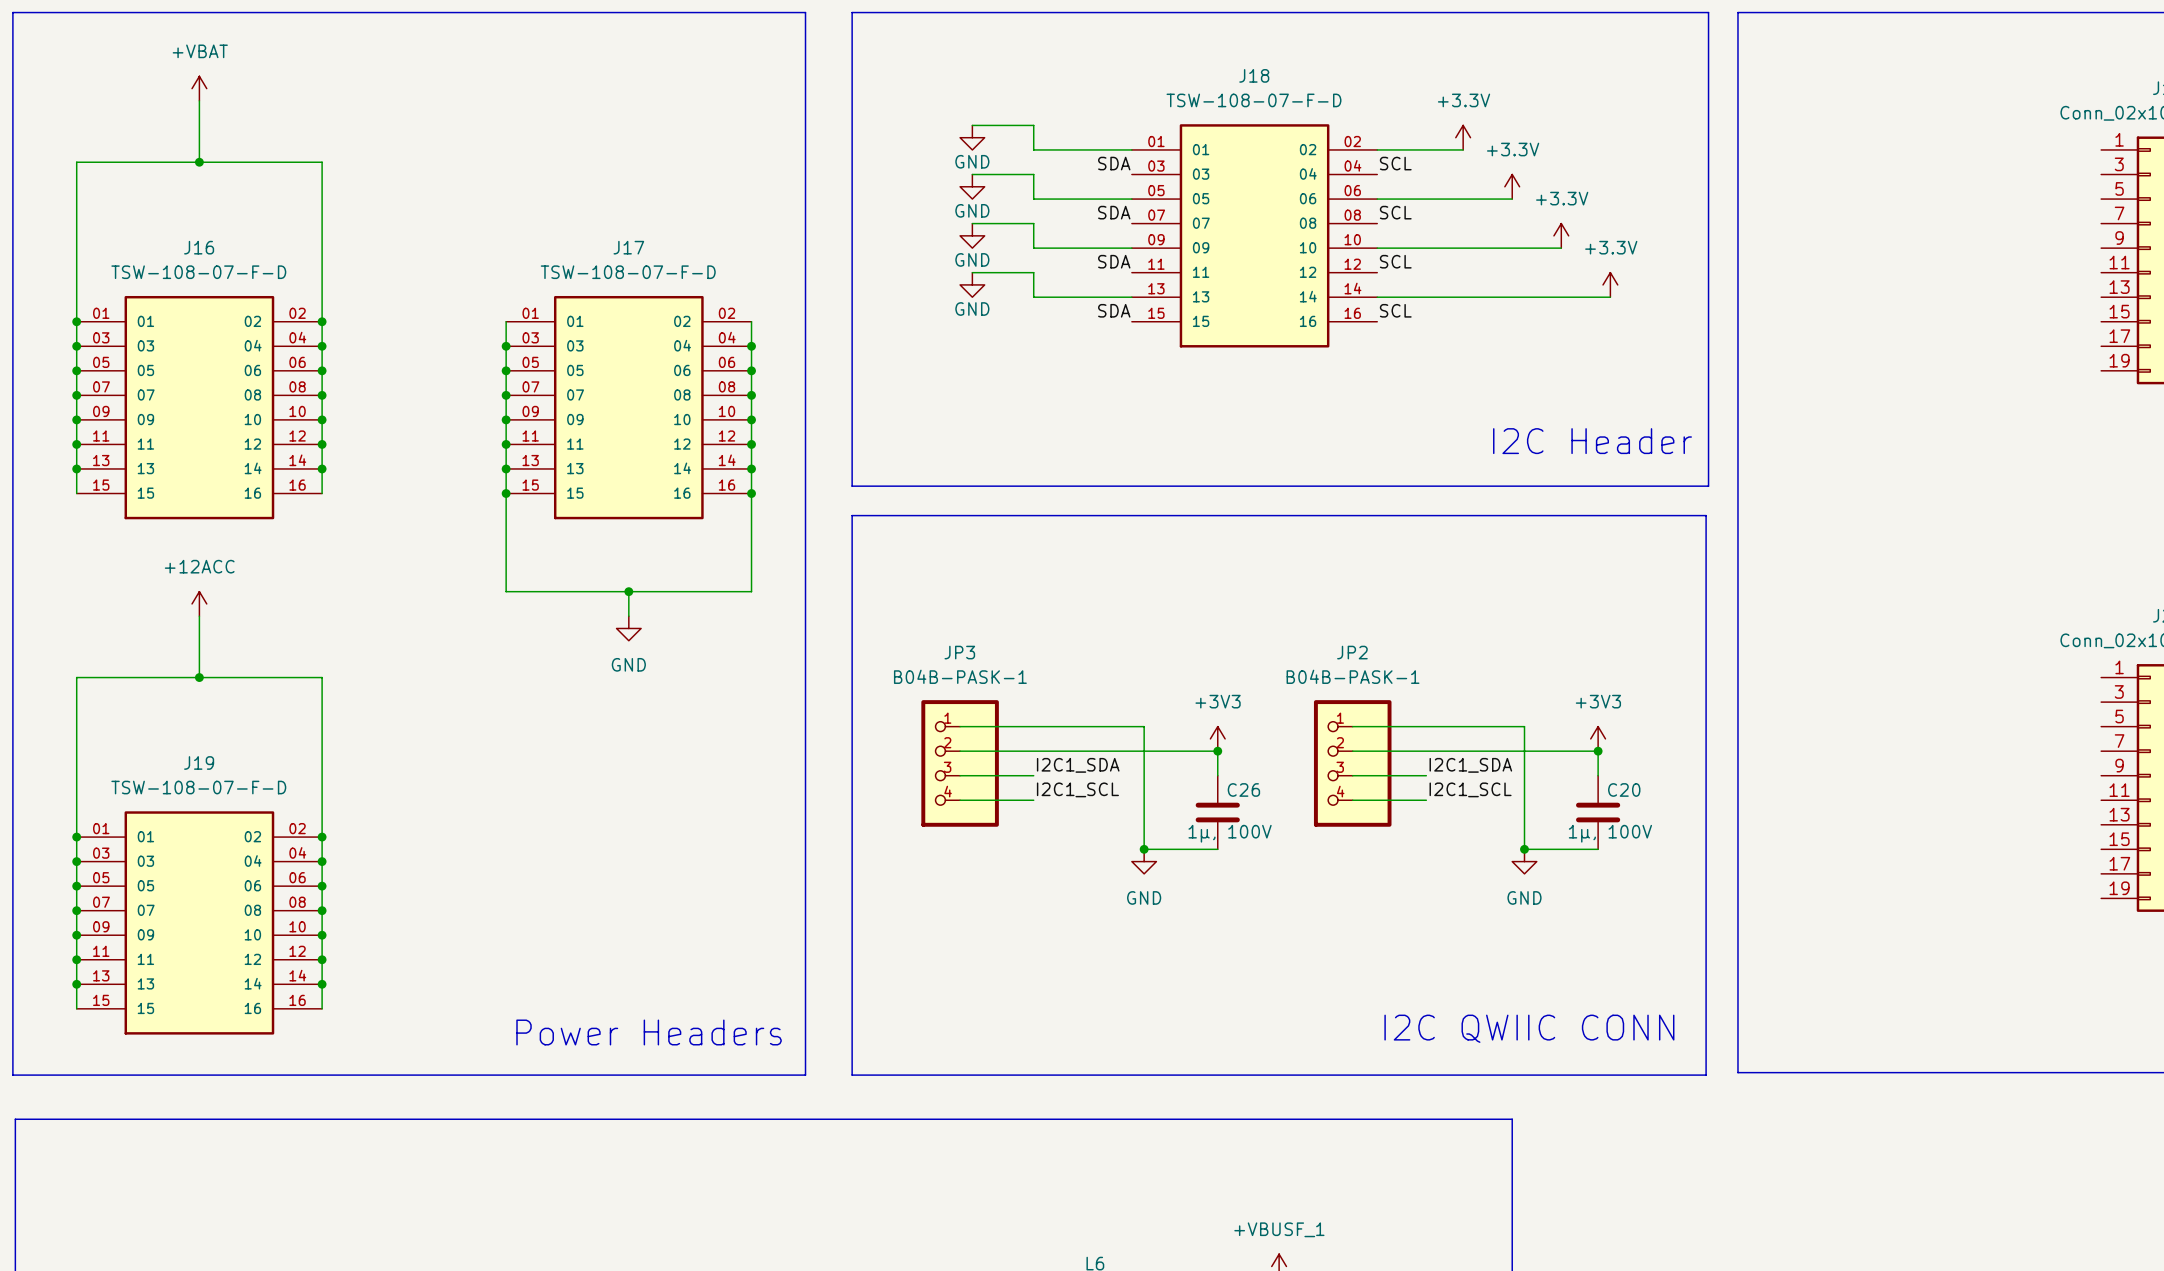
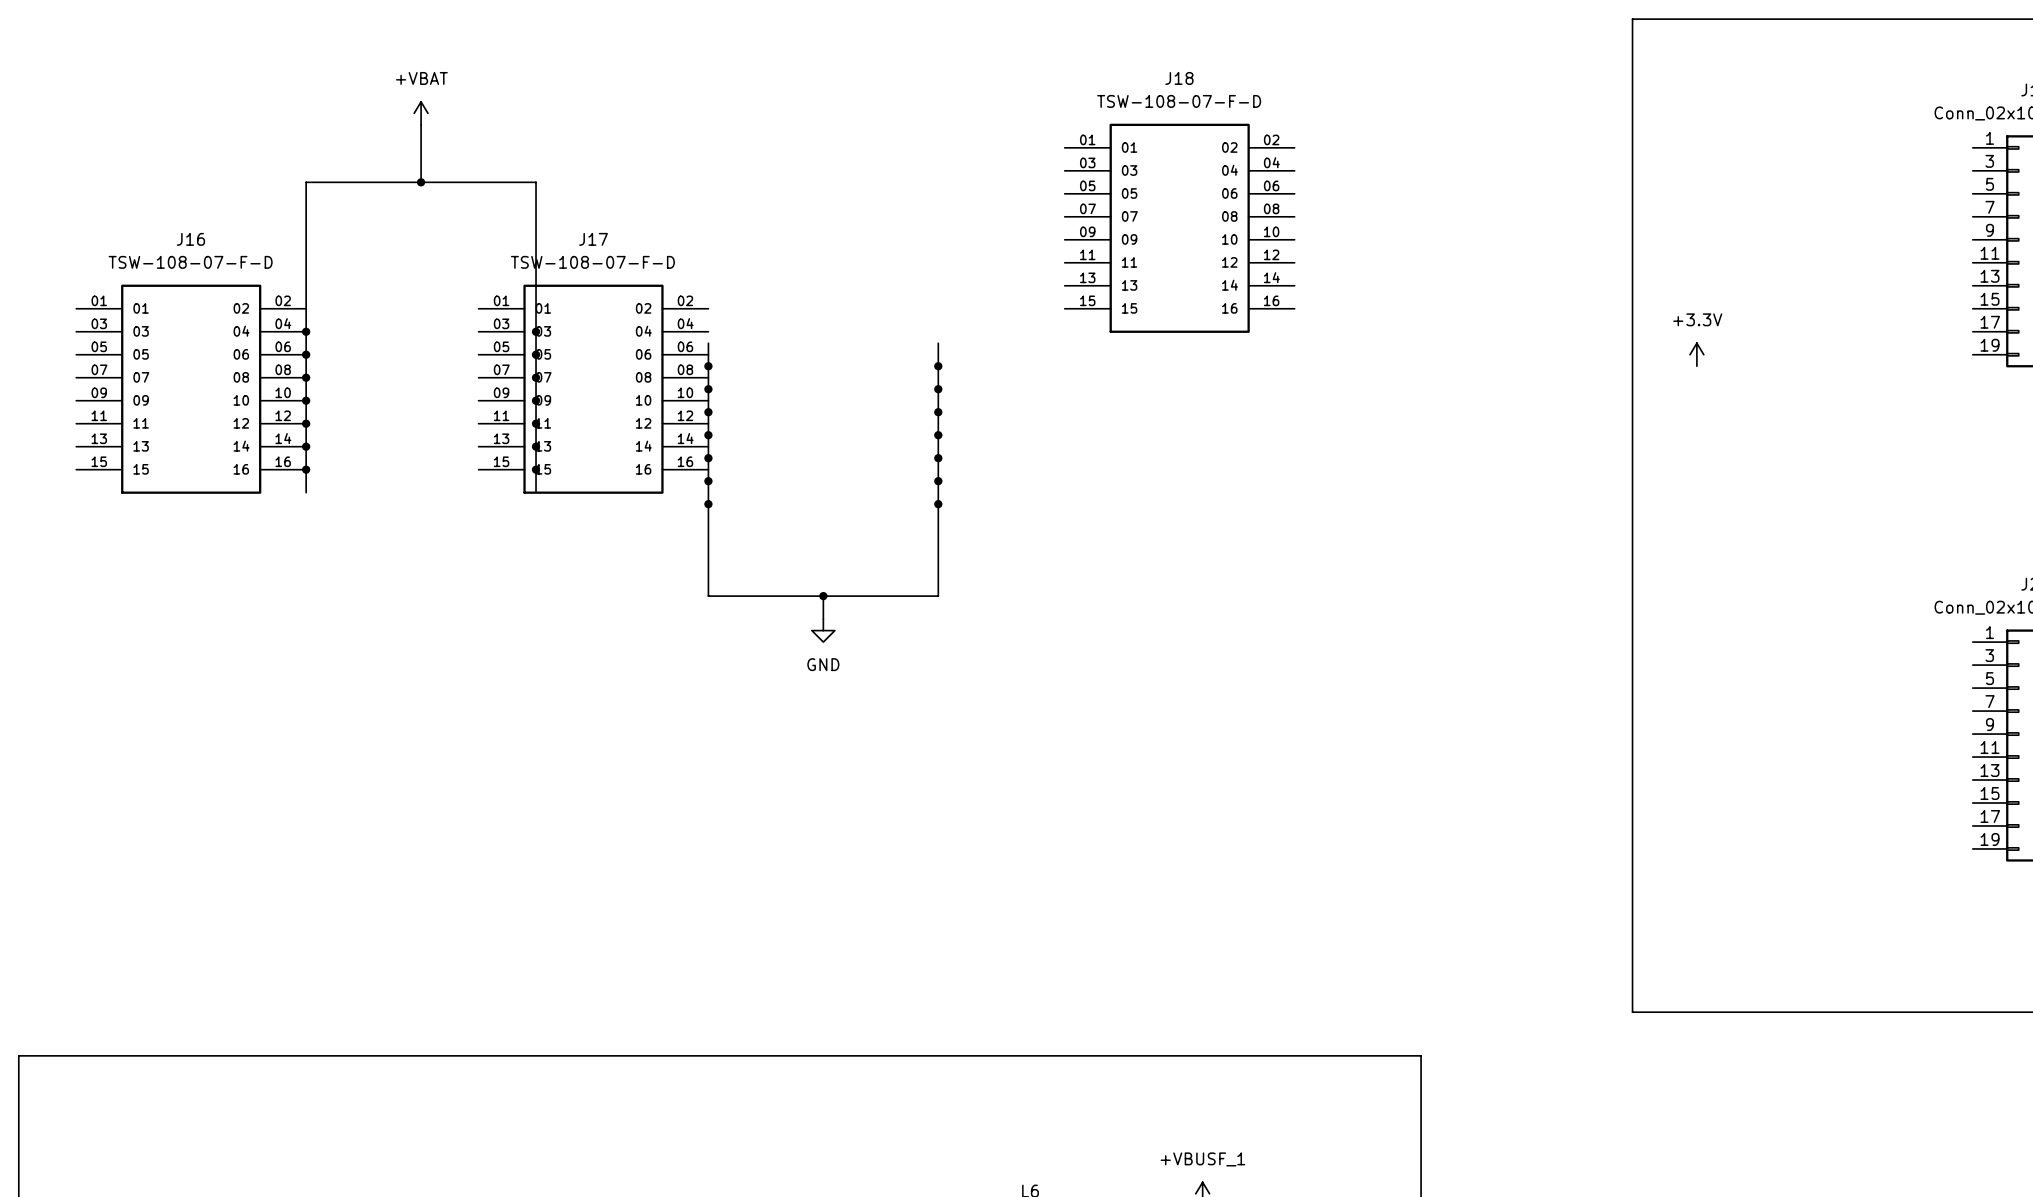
line: (12, 12) (805, 12) (805, 1075) (12, 1075) (12, 12) -> none
line: (852, 12) (1708, 12) (1708, 486) (852, 486) (852, 12) -> none
power symbol: +VBAT (199, 88) -> none
wire: (199, 100) (199, 162) -> none
power symbol: none -> +VBAT (421, 113)
wire: none -> (421, 124) (421, 182)
wire: (972, 125) (1033, 125) (1033, 149) (1131, 149) -> none
power symbol: GND (972, 137) -> none
power symbol: +3.3V (1463, 137) -> none
wire: (1377, 149) (1463, 149) -> none
junction: (199, 162) -> none
label: SDA (1114, 163) -> none
label: SCL (1395, 163) -> none
wire: (972, 174) (1033, 174) (1033, 199) (1131, 199) -> none
wire: (322, 186) (322, 162) (76, 162) (76, 493) -> (306, 182) (536, 182) (536, 492)
junction: none -> (421, 182)
power symbol: GND (972, 186) -> none
power symbol: +3.3V (1512, 186) -> none
wire: (1377, 199) (1512, 199) -> none
label: SDA (1114, 212) -> none
label: SCL (1395, 212) -> none
wire: (972, 223) (1033, 223) (1033, 248) (1131, 248) -> none
power symbol: GND (972, 235) -> none
power symbol: +3.3V (1561, 235) -> none
wire: (1377, 248) (1561, 248) -> none
label: SDA (1114, 261) -> none
label: SCL (1395, 261) -> none
wire: (972, 272) (1033, 272) (1033, 297) (1131, 297) -> none
power symbol: GND (972, 284) -> none
power symbol: +3.3V (1610, 284) -> none
wire: (1377, 297) (1610, 297) -> none
label: SDA (1114, 310) -> none
label: SCL (1395, 310) -> none
junction: (76, 321) -> none
junction: (322, 321) -> none
wire: (506, 321) (506, 591) (751, 591) -> (938, 343) (938, 596) (708, 596) (708, 561)
wire: (751, 321) (751, 358) -> none
junction: (76, 346) -> none
junction: (506, 346) -> none
junction: none -> (536, 331)
junction: (751, 346) -> none
junction: (76, 370) -> none
junction: (506, 370) -> none
junction: none -> (536, 354)
junction: (751, 370) -> none
power symbol: none -> +3.3V (1696, 354)
junction: none -> (708, 366)
junction: none -> (938, 366)
junction: (76, 395) -> none
junction: (506, 395) -> none
junction: none -> (536, 377)
junction: (751, 395) -> none
junction: none -> (708, 389)
junction: none -> (938, 389)
junction: (76, 419) -> none
junction: (506, 419) -> none
junction: none -> (536, 400)
junction: (751, 419) -> none
junction: none -> (708, 412)
junction: none -> (938, 412)
text: I2C Header (1592, 441) -> none
junction: (76, 444) -> none
junction: (506, 444) -> none
junction: none -> (536, 423)
junction: (751, 444) -> none
junction: none -> (708, 435)
junction: none -> (938, 435)
junction: (76, 468) -> none
junction: (506, 468) -> none
junction: none -> (536, 446)
junction: (751, 468) -> none
junction: none -> (708, 458)
junction: none -> (938, 458)
wire: none -> (306, 469) (306, 492)
junction: none -> (306, 469)
junction: (506, 493) -> none
junction: none -> (536, 469)
junction: (751, 493) -> none
junction: none -> (708, 481)
junction: none -> (938, 481)
line: (852, 515) (852, 1075) (1706, 1075) (1706, 515) (852, 515) -> none
junction: none -> (708, 504)
junction: none -> (938, 504)
wire: (628, 591) (628, 616) -> none
junction: (628, 591) -> none
power symbol: +12ACC (199, 603) -> none
wire: (199, 616) (199, 677) -> none
power symbol: GND (628, 628) -> none
wire: none -> (823, 596) (823, 619)
junction: none -> (823, 596)
power symbol: none -> GND (823, 630)
junction: (199, 677) -> none
wire: (960, 726) (1144, 726) (1144, 849) (1217, 849) -> none
wire: (1352, 726) (1524, 726) (1524, 849) (1598, 849) -> none
power symbol: +3V3 (1217, 738) -> none
power symbol: +3V3 (1598, 738) -> none
wire: (960, 751) (1217, 751) (1217, 775) -> none
junction: (1217, 751) -> none
wire: (1352, 751) (1598, 751) (1598, 775) -> none
junction: (1598, 751) -> none
JP3: B04B-PASK-1 (960, 763) -> none
JP2: B04B-PASK-1 (1352, 763) -> none
label: I2C1_SDA (1078, 765) -> none
label: I2C1_SDA (1470, 765) -> none
wire: (960, 775) (1033, 775) -> none
wire: (1352, 775) (1426, 775) -> none
label: I2C1_SCL (1077, 789) -> none
label: I2C1_SCL (1470, 789) -> none
wire: (960, 800) (1033, 800) -> none
wire: (1352, 800) (1426, 800) -> none
C26: 1µ, 100V (1217, 812) -> none
C20: 1µ, 100V (1598, 812) -> none
junction: (76, 837) -> none
junction: (322, 837) -> none
junction: (1144, 849) -> none
junction: (1524, 849) -> none
junction: (76, 861) -> none
junction: (322, 861) -> none
power symbol: GND (1144, 861) -> none
power symbol: GND (1524, 861) -> none
junction: (76, 886) -> none
junction: (322, 886) -> none
junction: (76, 910) -> none
junction: (322, 910) -> none
J19: TSW-108-07-F-D (199, 922) -> none
junction: (76, 935) -> none
junction: (322, 935) -> none
junction: (76, 959) -> none
junction: (322, 959) -> none
junction: (76, 984) -> none
junction: (322, 984) -> none
wire: (76, 1008) (76, 677) (322, 677) (322, 1008) -> none
text: I2C QWIIC CONN (1529, 1028) -> none
text: Power Headers (649, 1032) -> none

